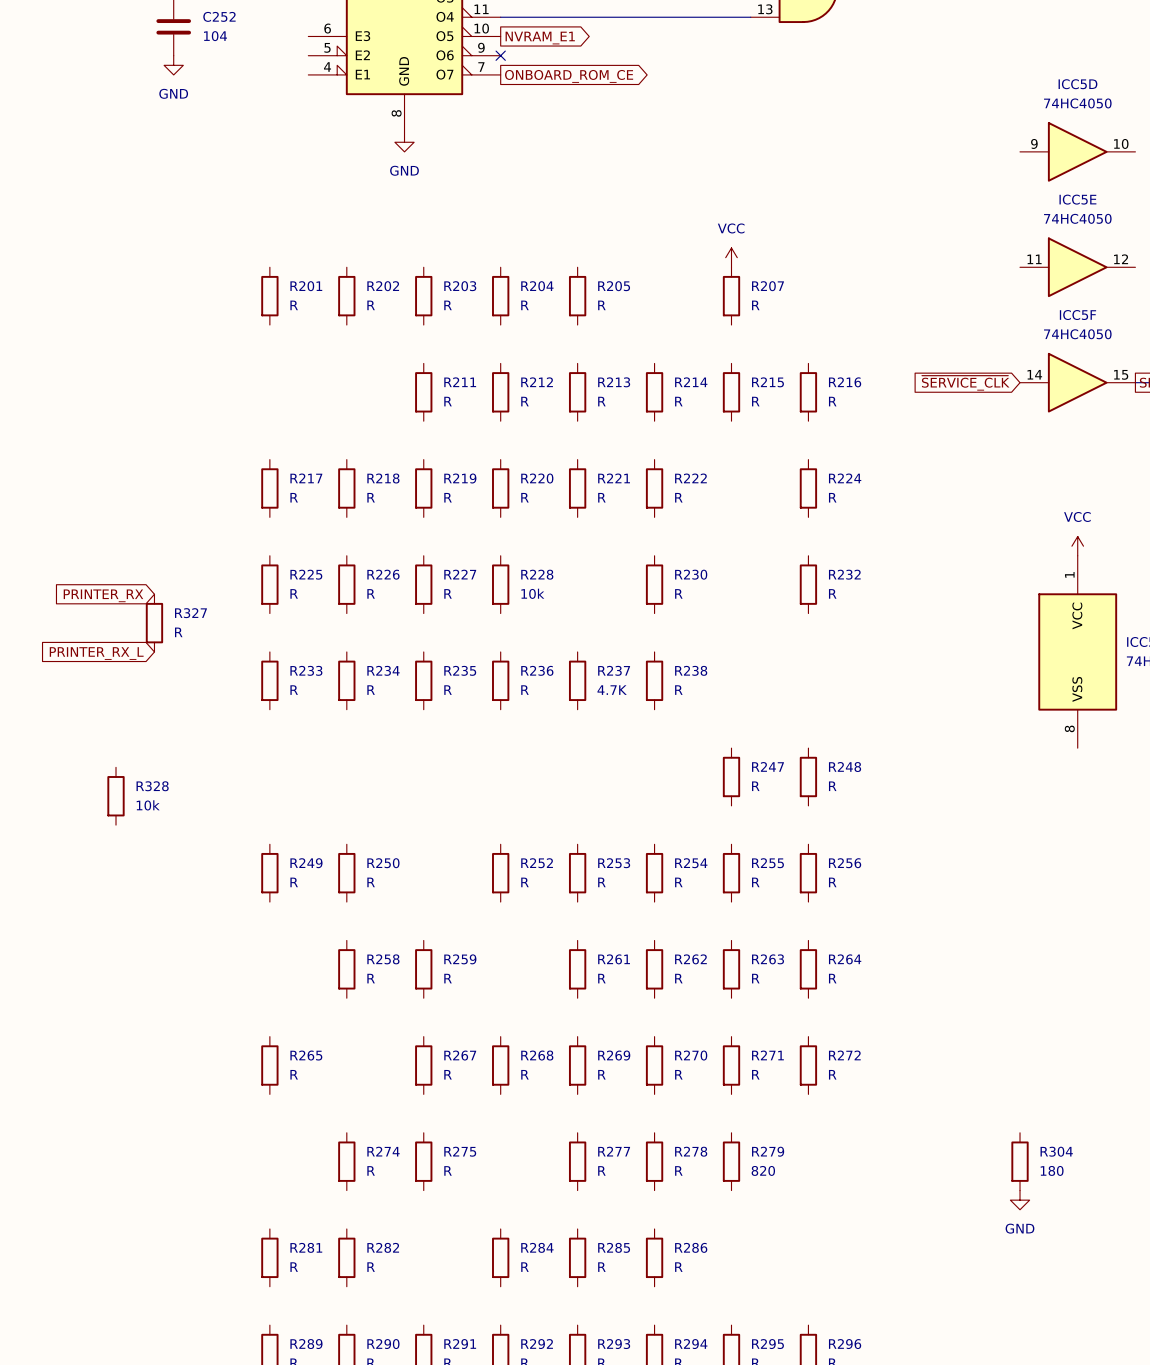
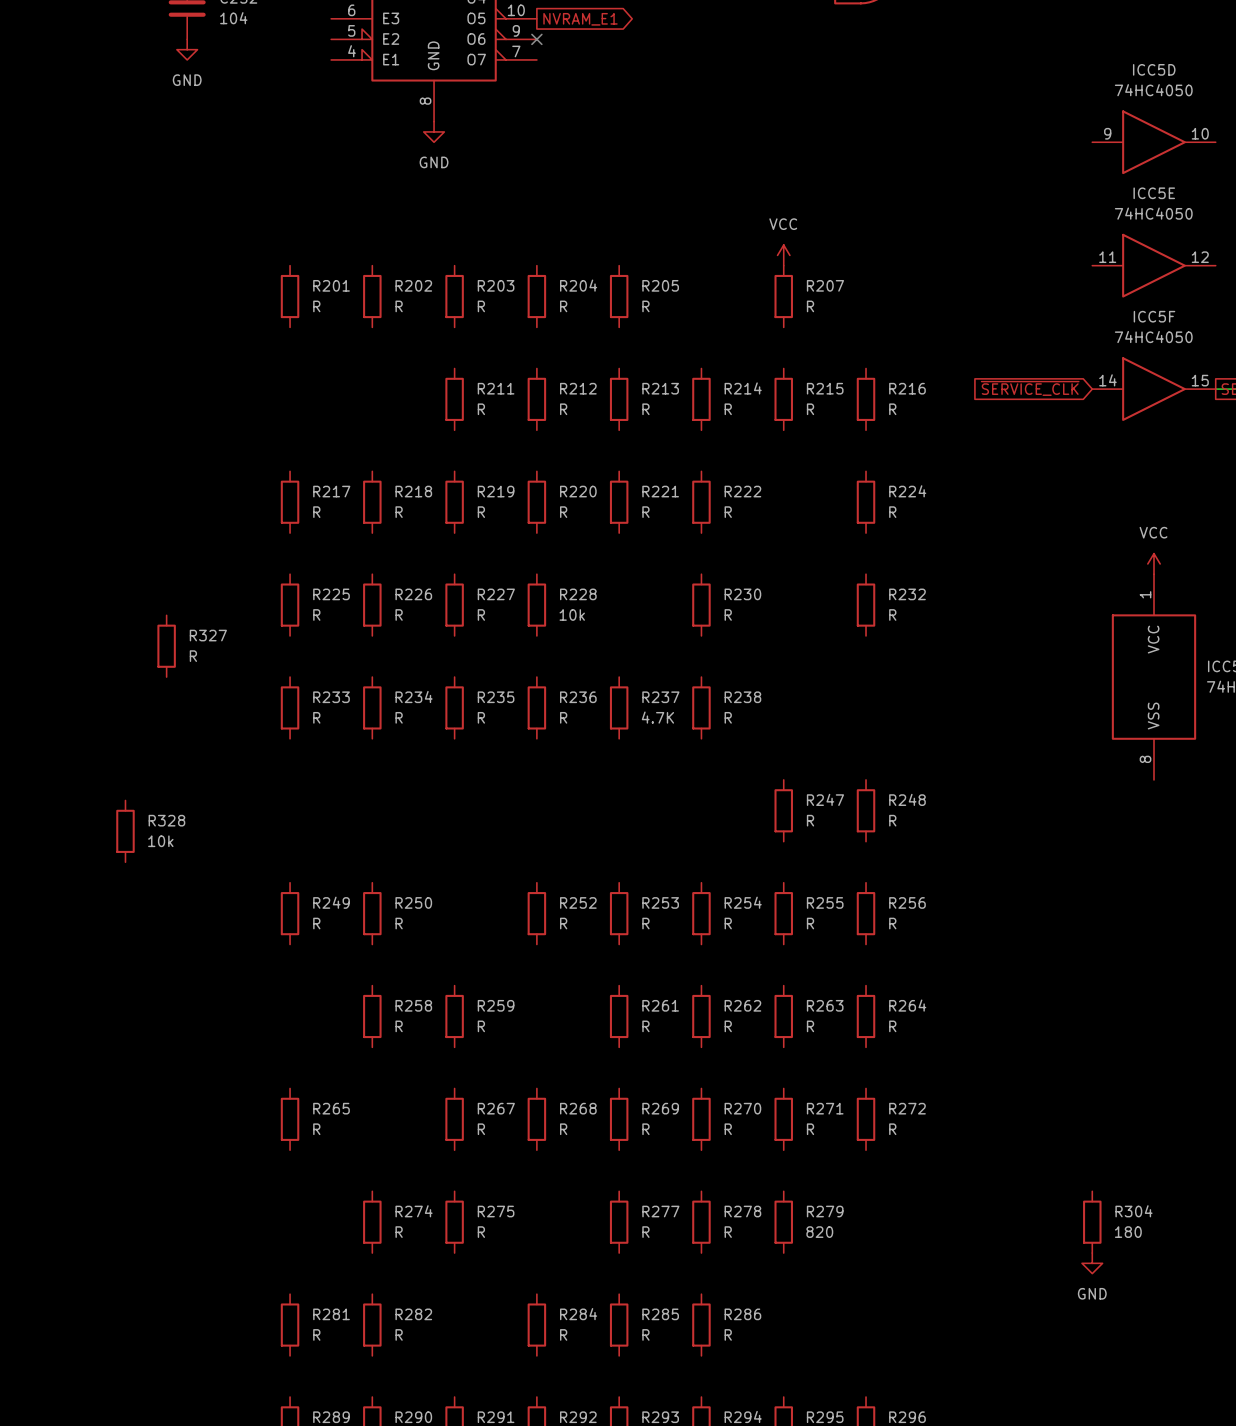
global label: ONBOARD_ROM_CE (569, 76) -> none
global label: PRINTER_RX (103, 595) -> none
global label: PRINTER_RX_L (96, 653) -> none

